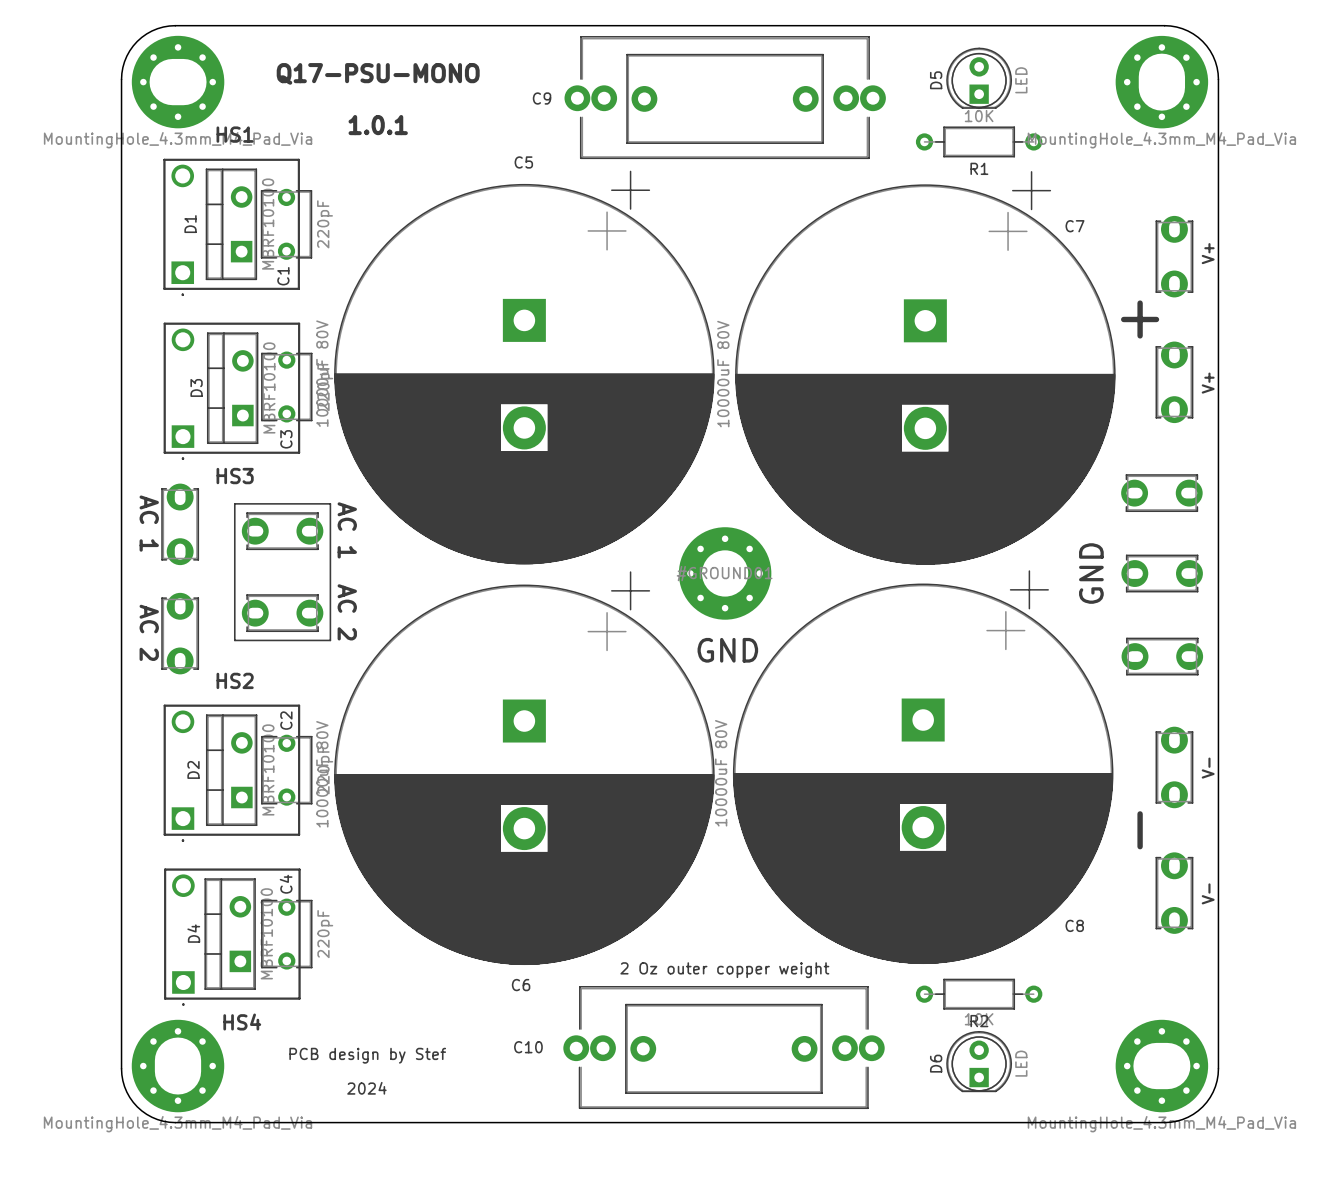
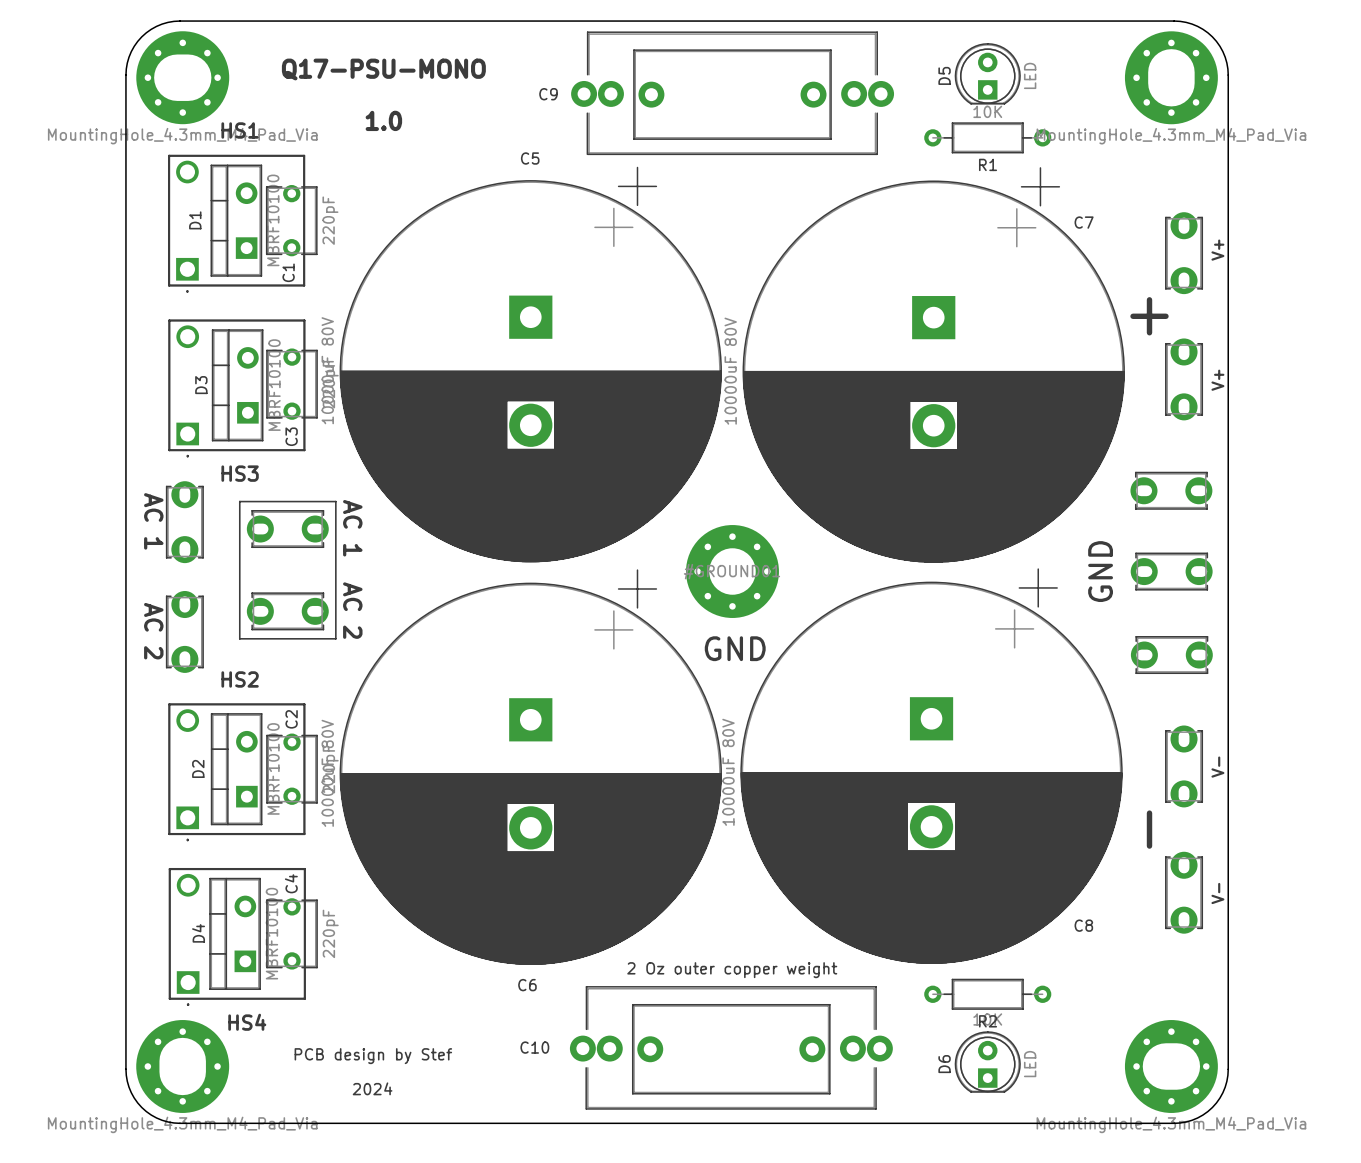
text: 1.0.1 (378, 125) -> 1.0 (383, 120)

